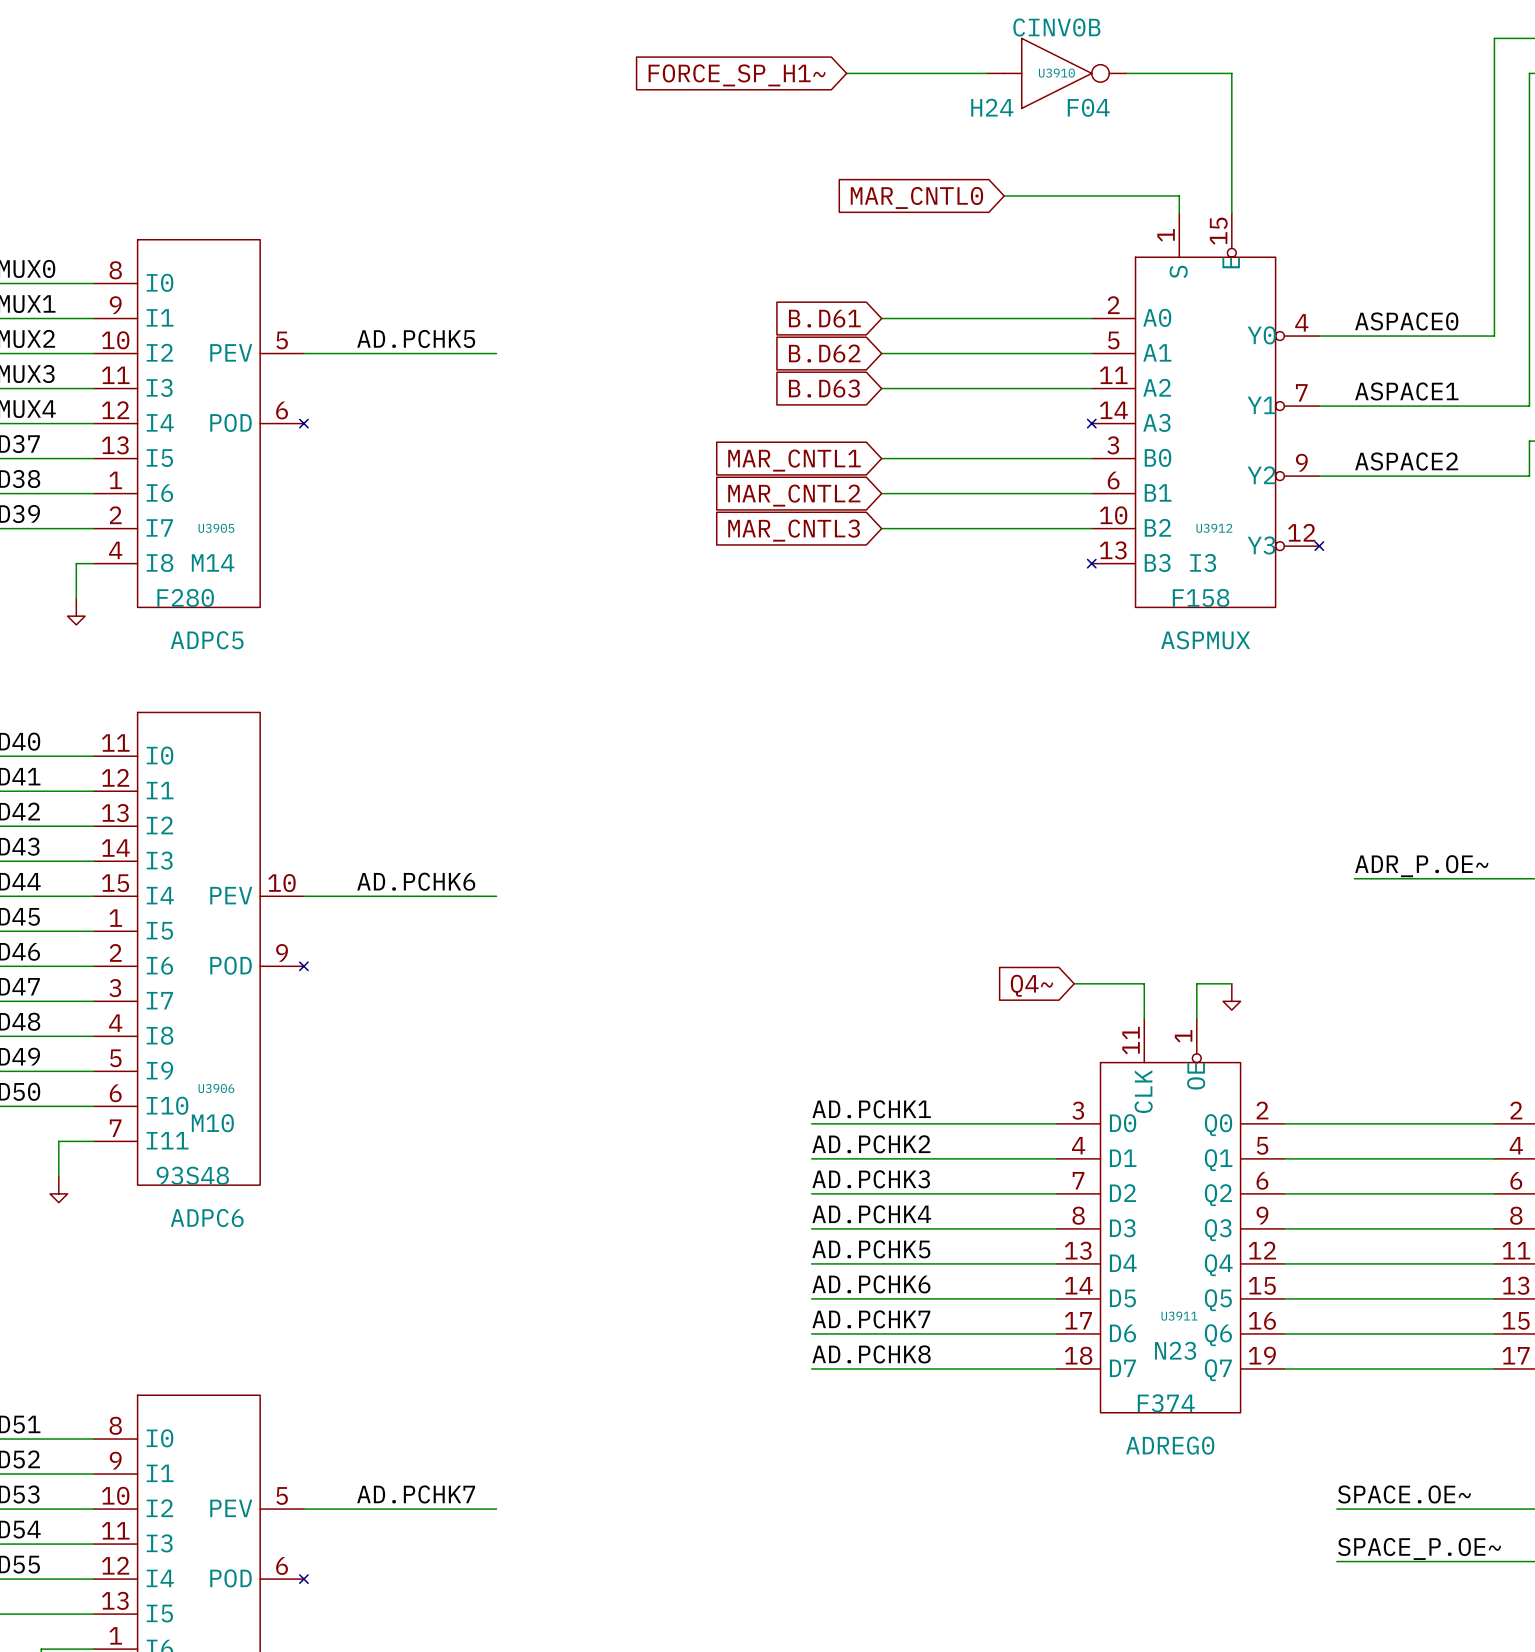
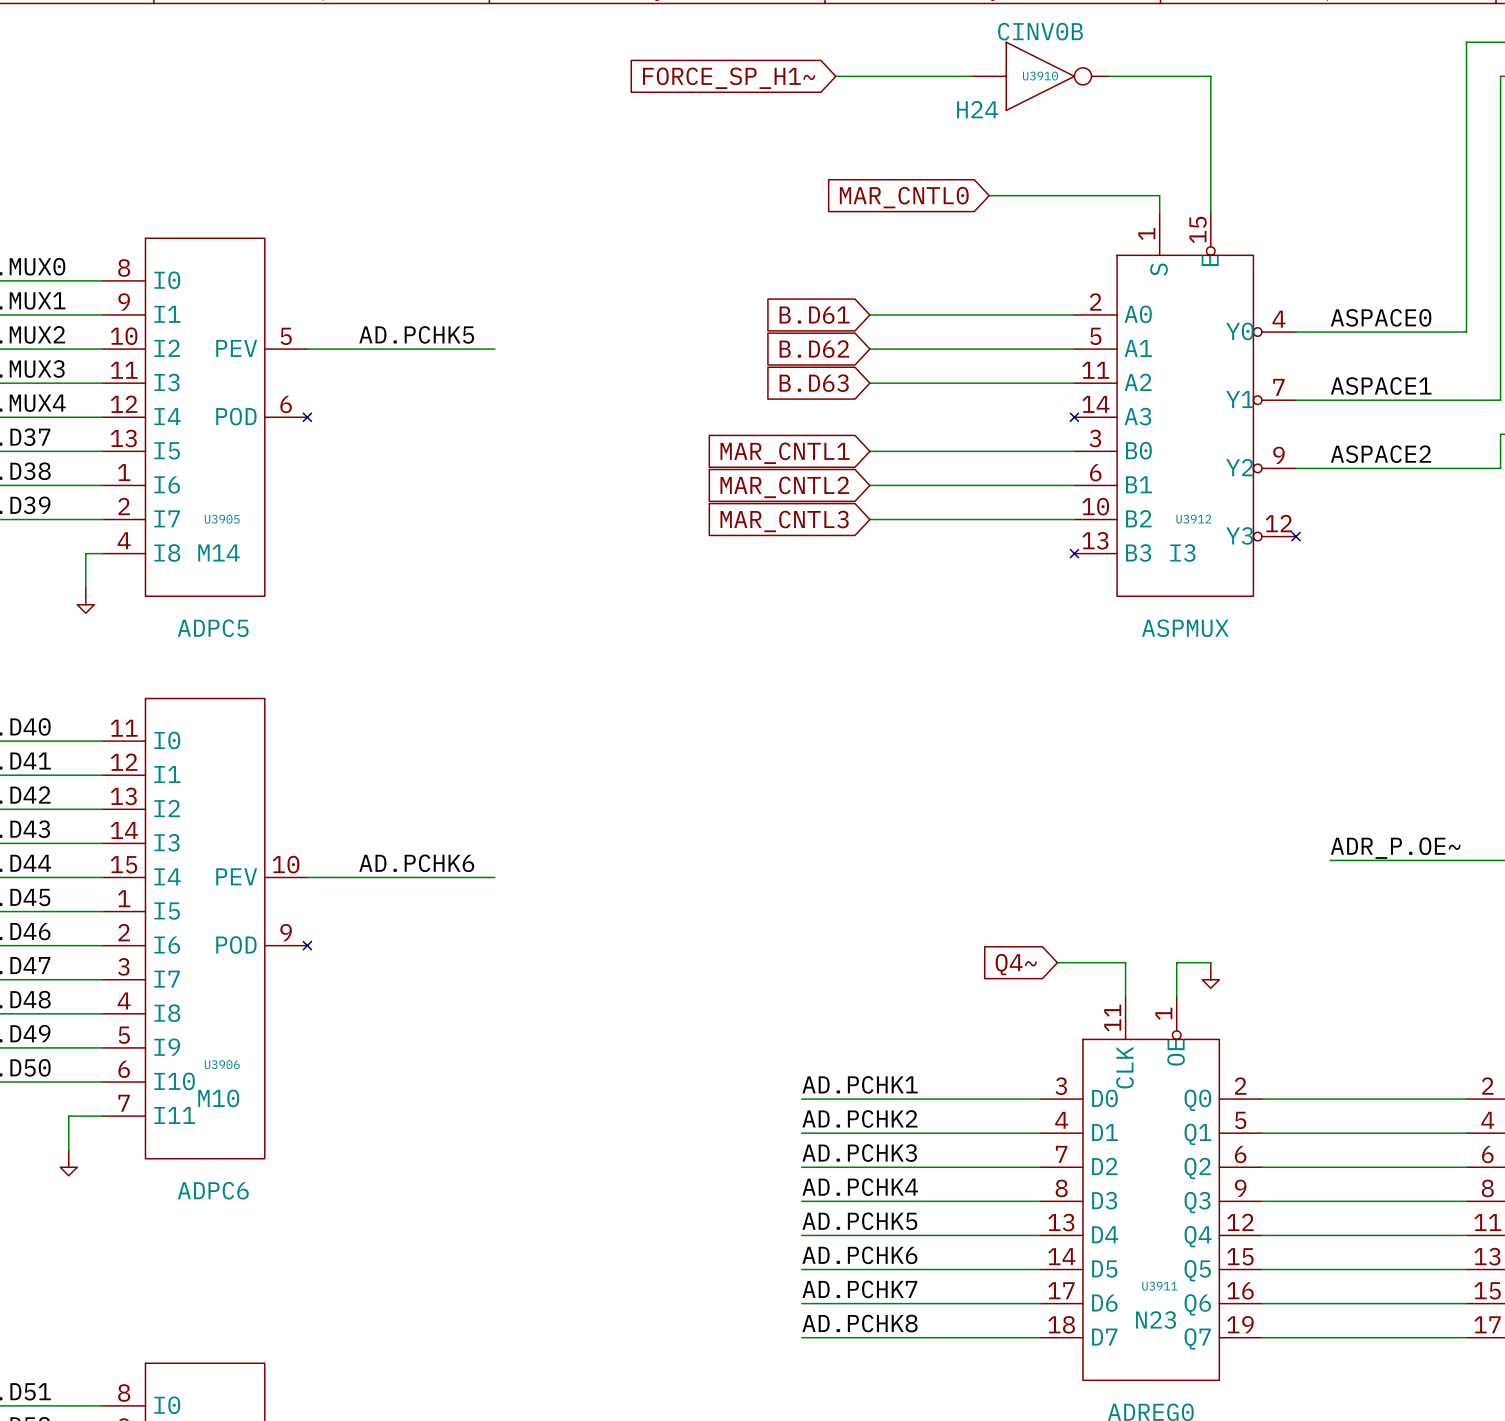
U3910 value: F04 (1088, 107) -> none
U3905 value: F280 (185, 597) -> none
U3912 value: F158 (1201, 597) -> none
U3906 value: 93S48 (192, 1175) -> none
U3911 value: F374 (1166, 1403) -> none

